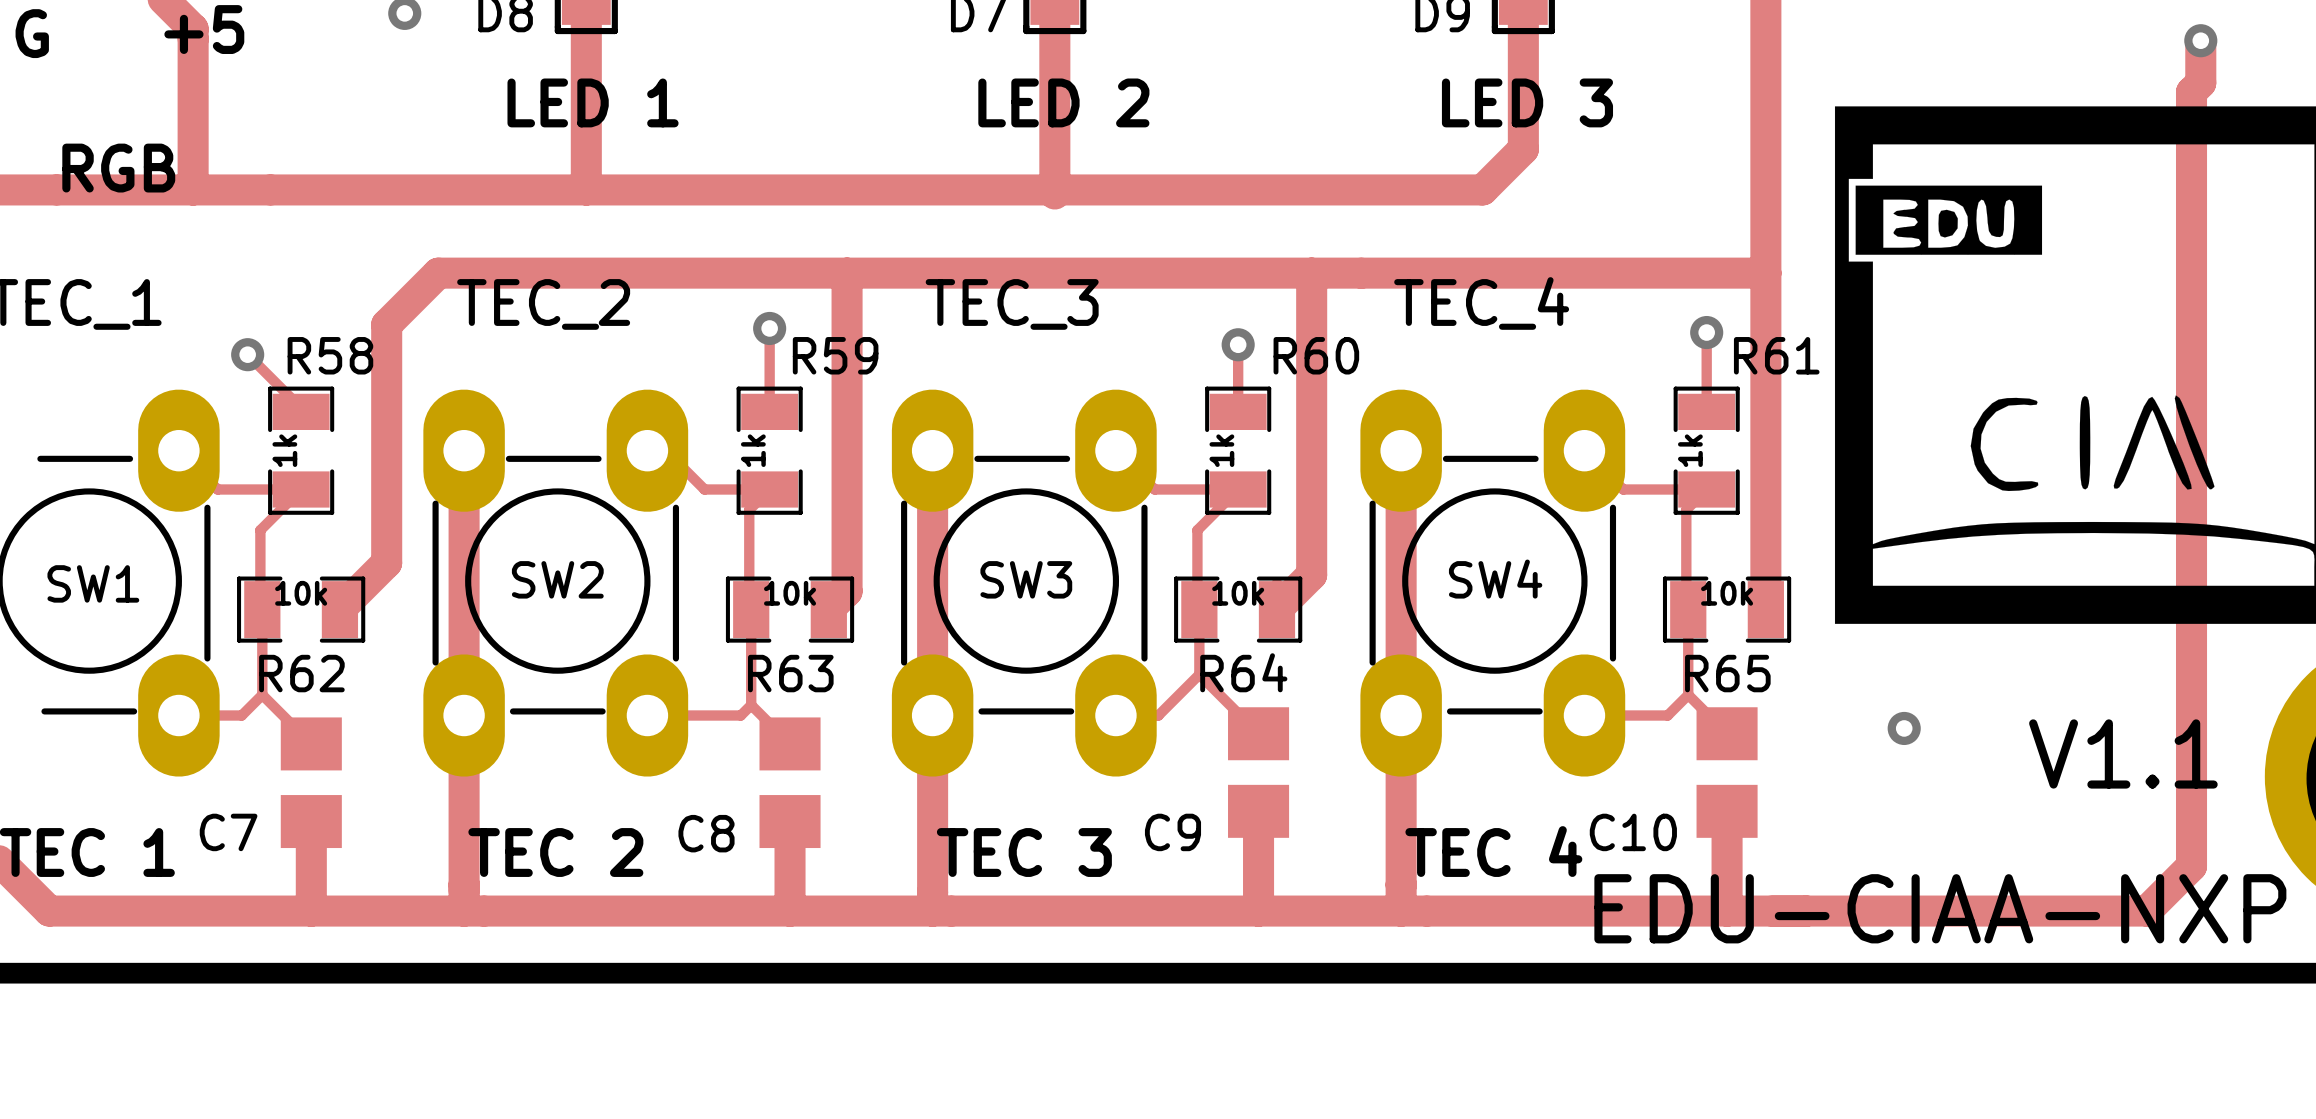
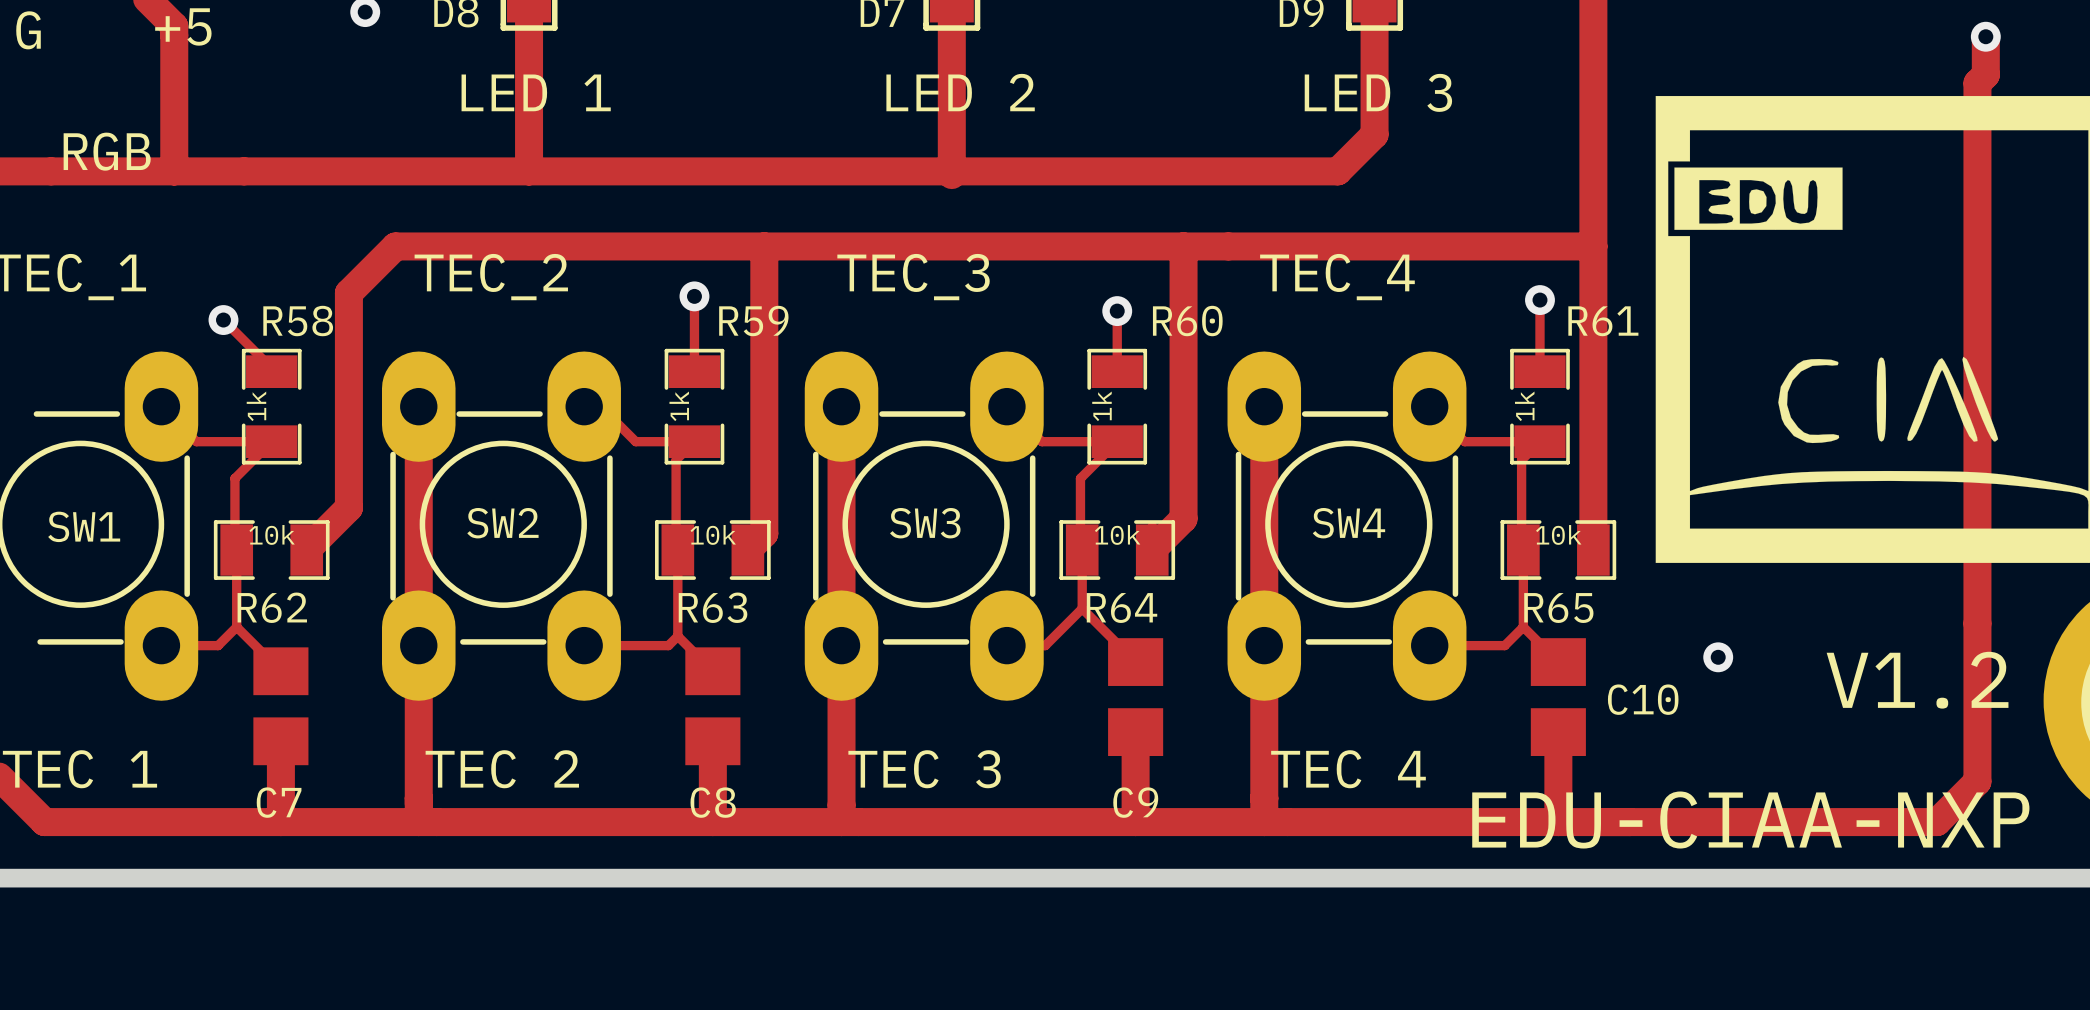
text: V1.1 (2123, 753) -> V1.2 (1917, 680)
C7 name position: C7 (228, 832) -> C7 (279, 802)
C9 name position: C9 (1172, 832) -> C9 (1135, 802)
C10 name position: C10 (1633, 832) -> C10 (1643, 699)
C8 name position: C8 (706, 833) -> C8 (713, 802)

